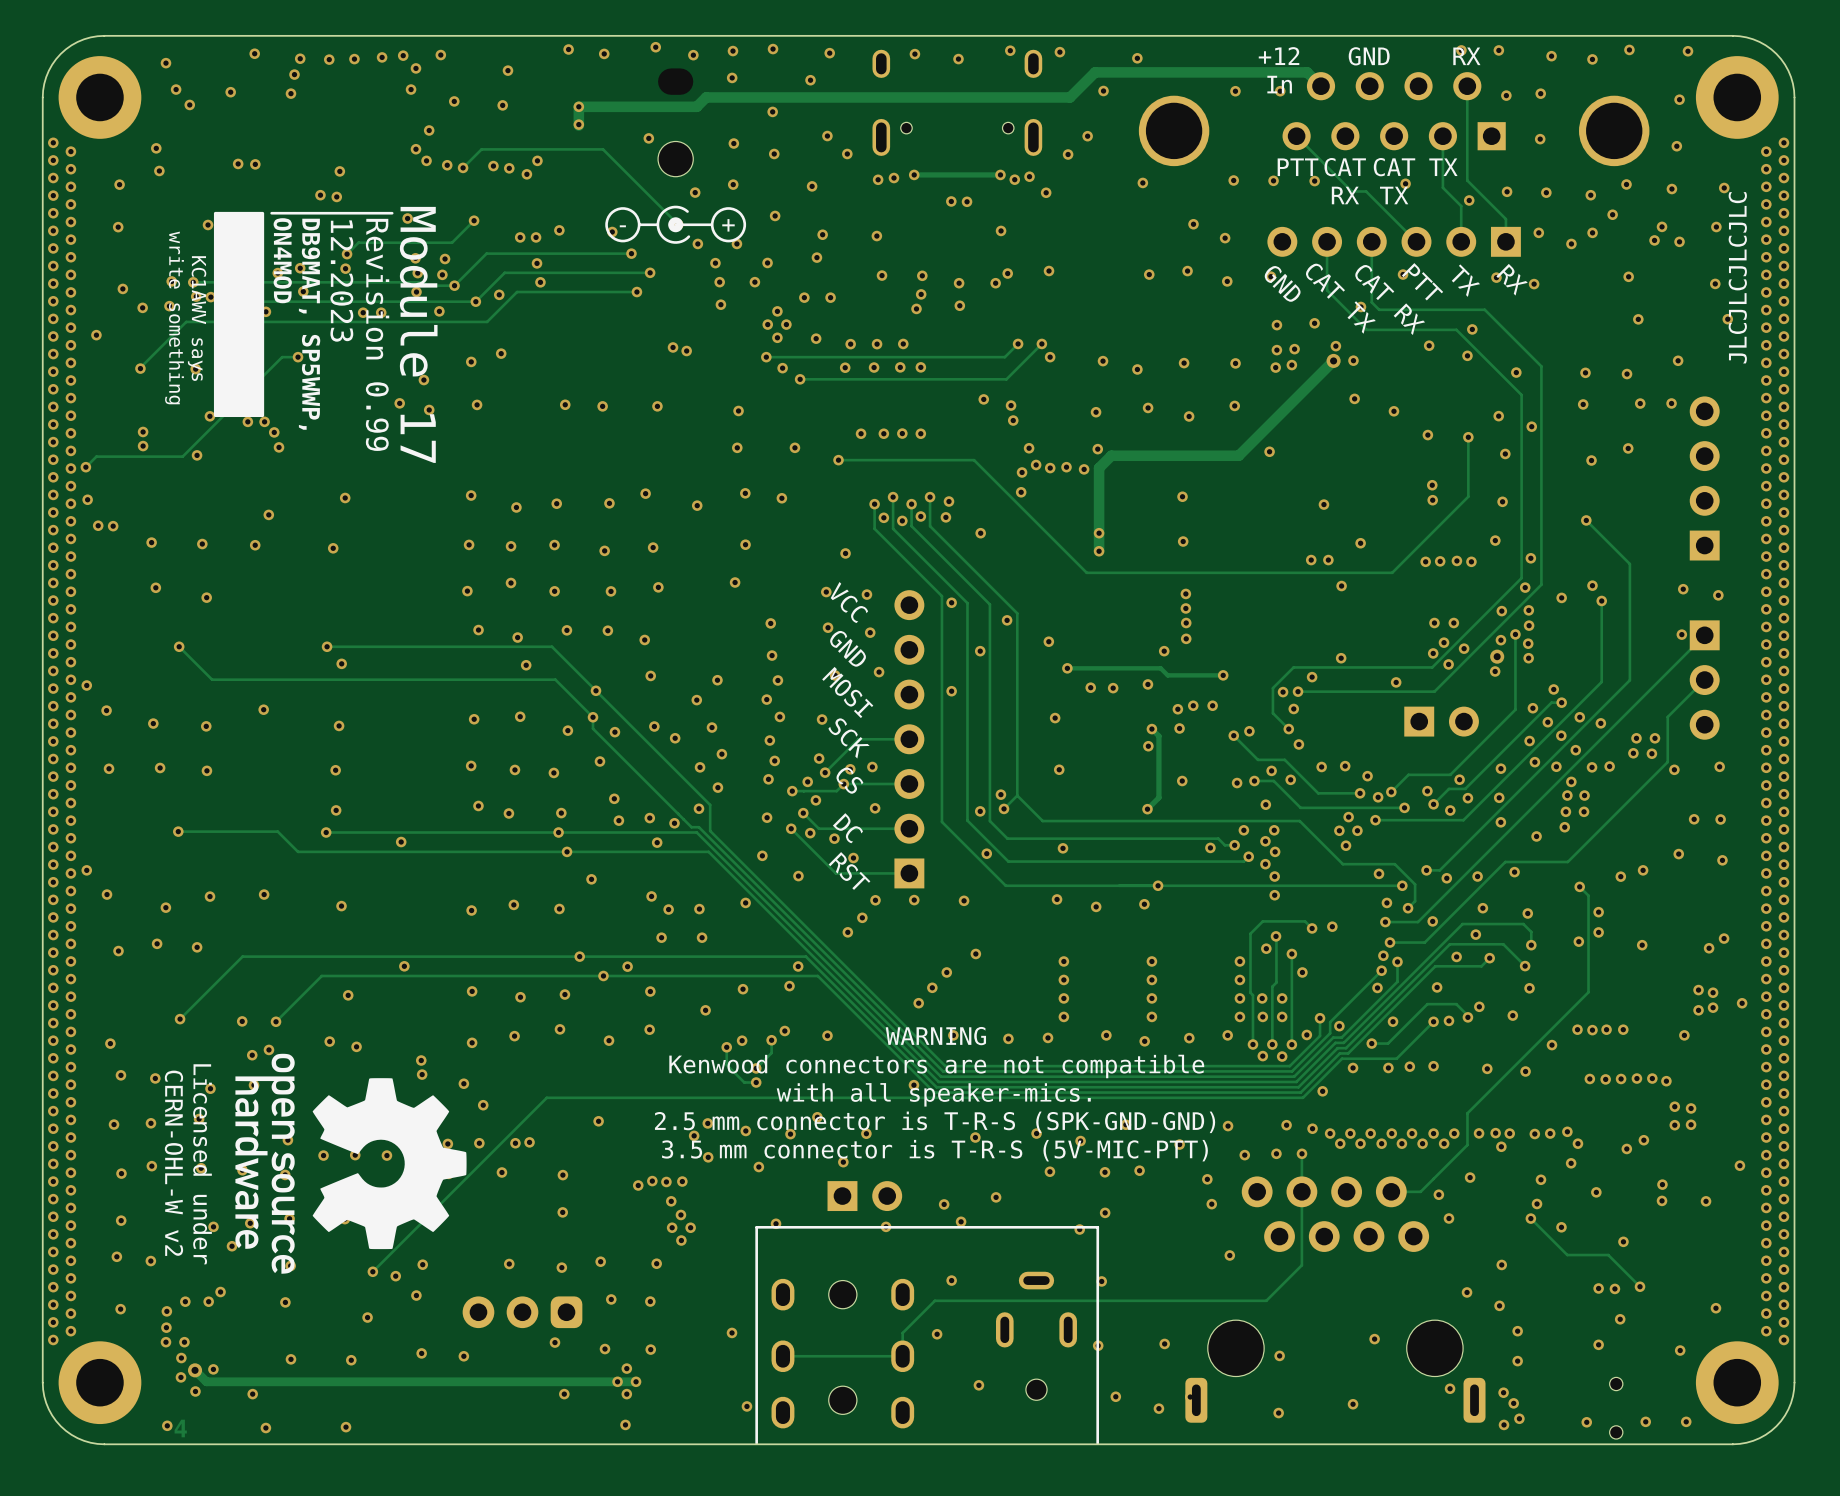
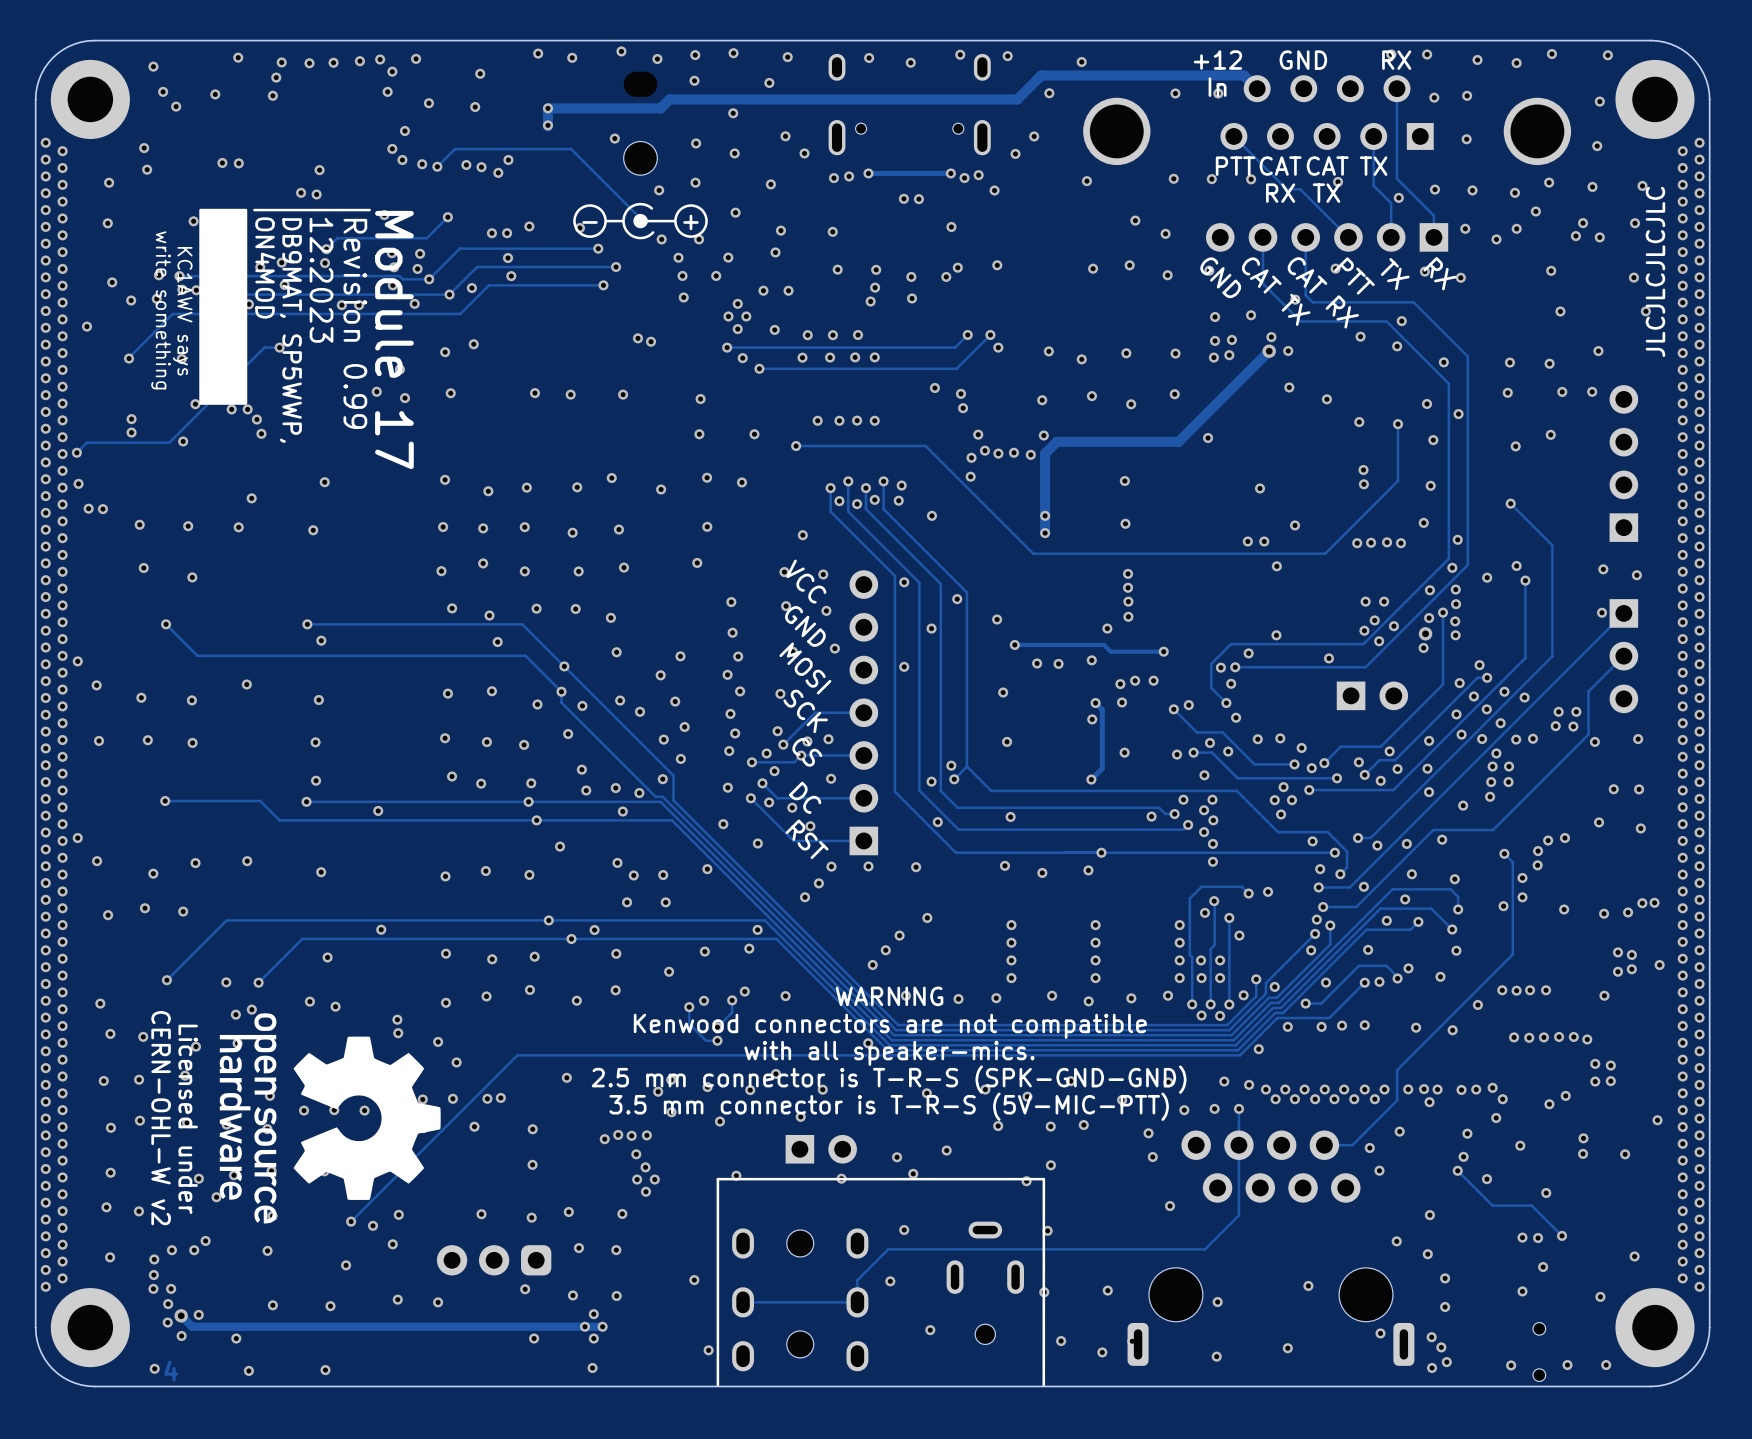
via: none -> (1548, 840)
via: (1620, 876) -> none
via: none -> (1538, 851)
via: none -> (1537, 865)
via: none -> (1654, 902)
via: none -> (1604, 913)

